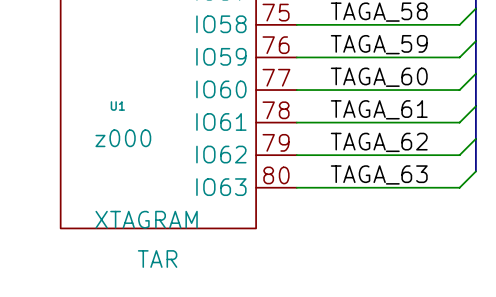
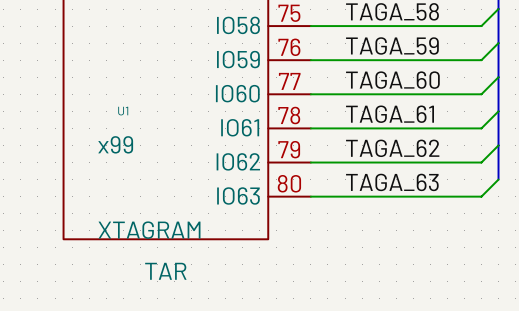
U1 text: z000 (123, 138) -> x99 (115, 144)

